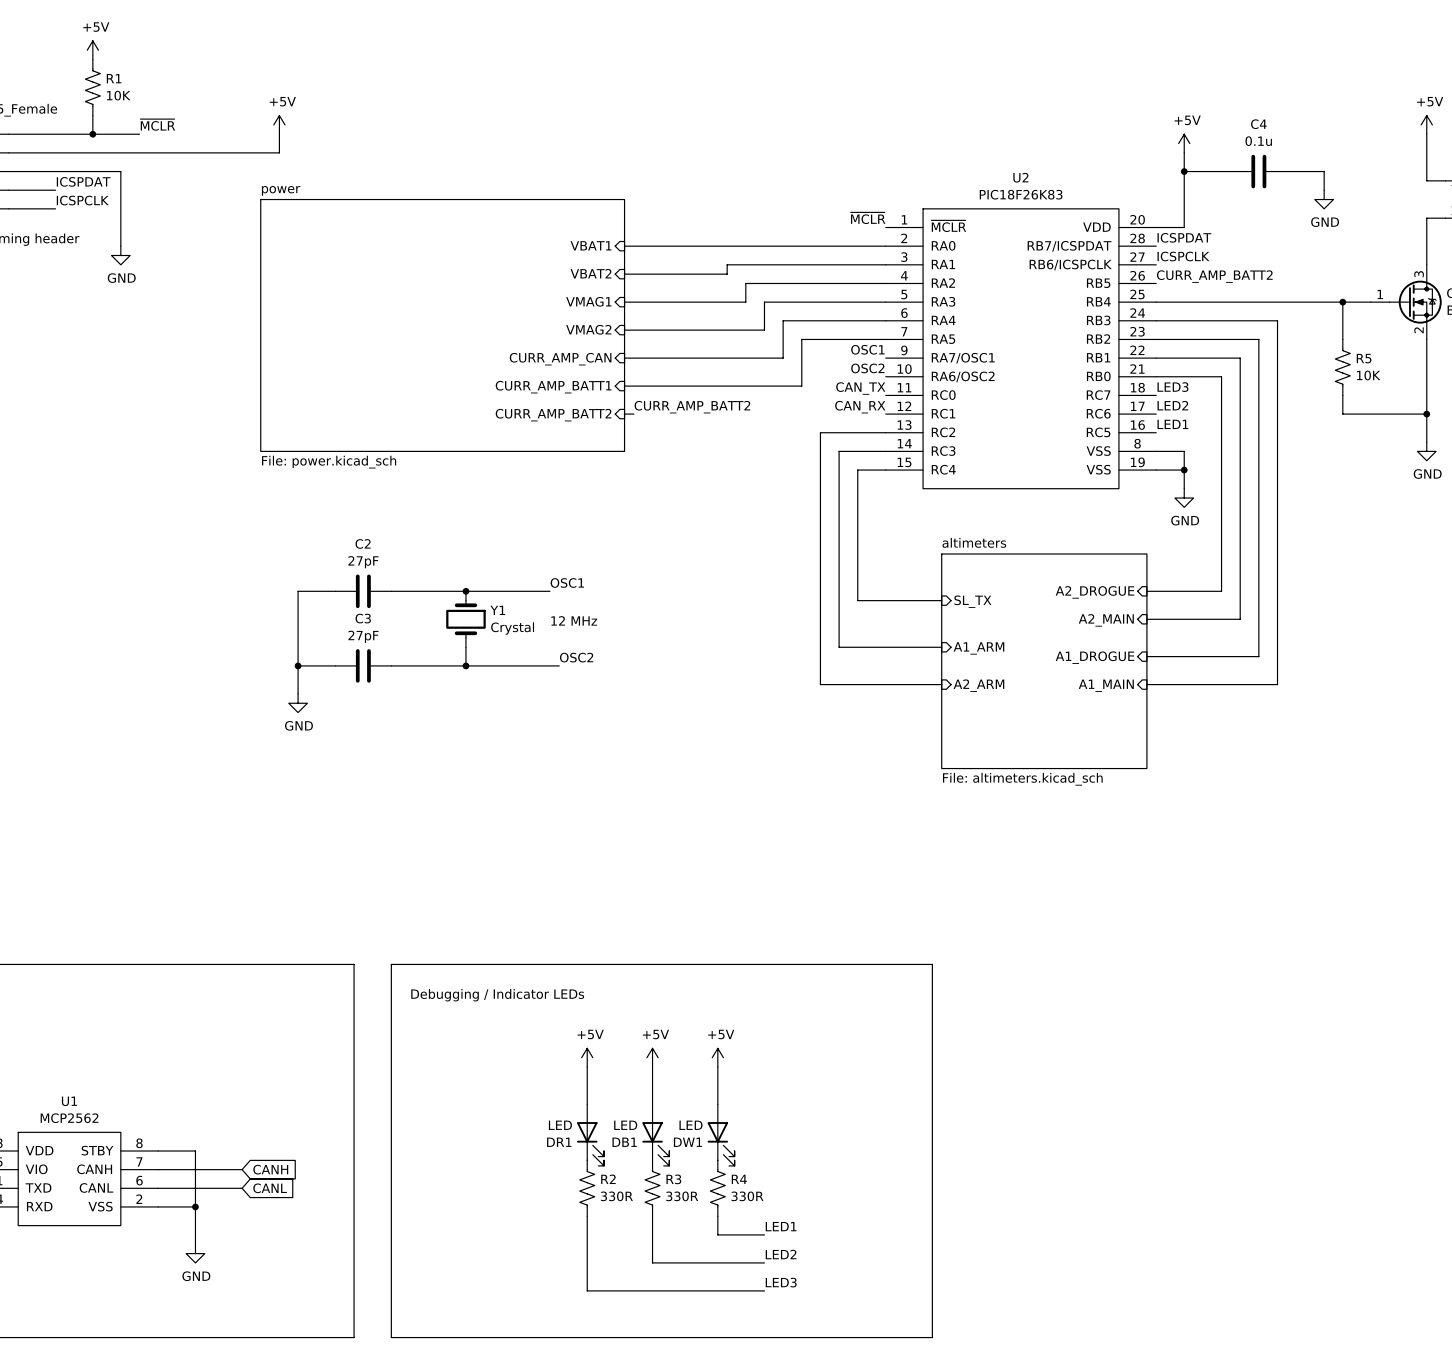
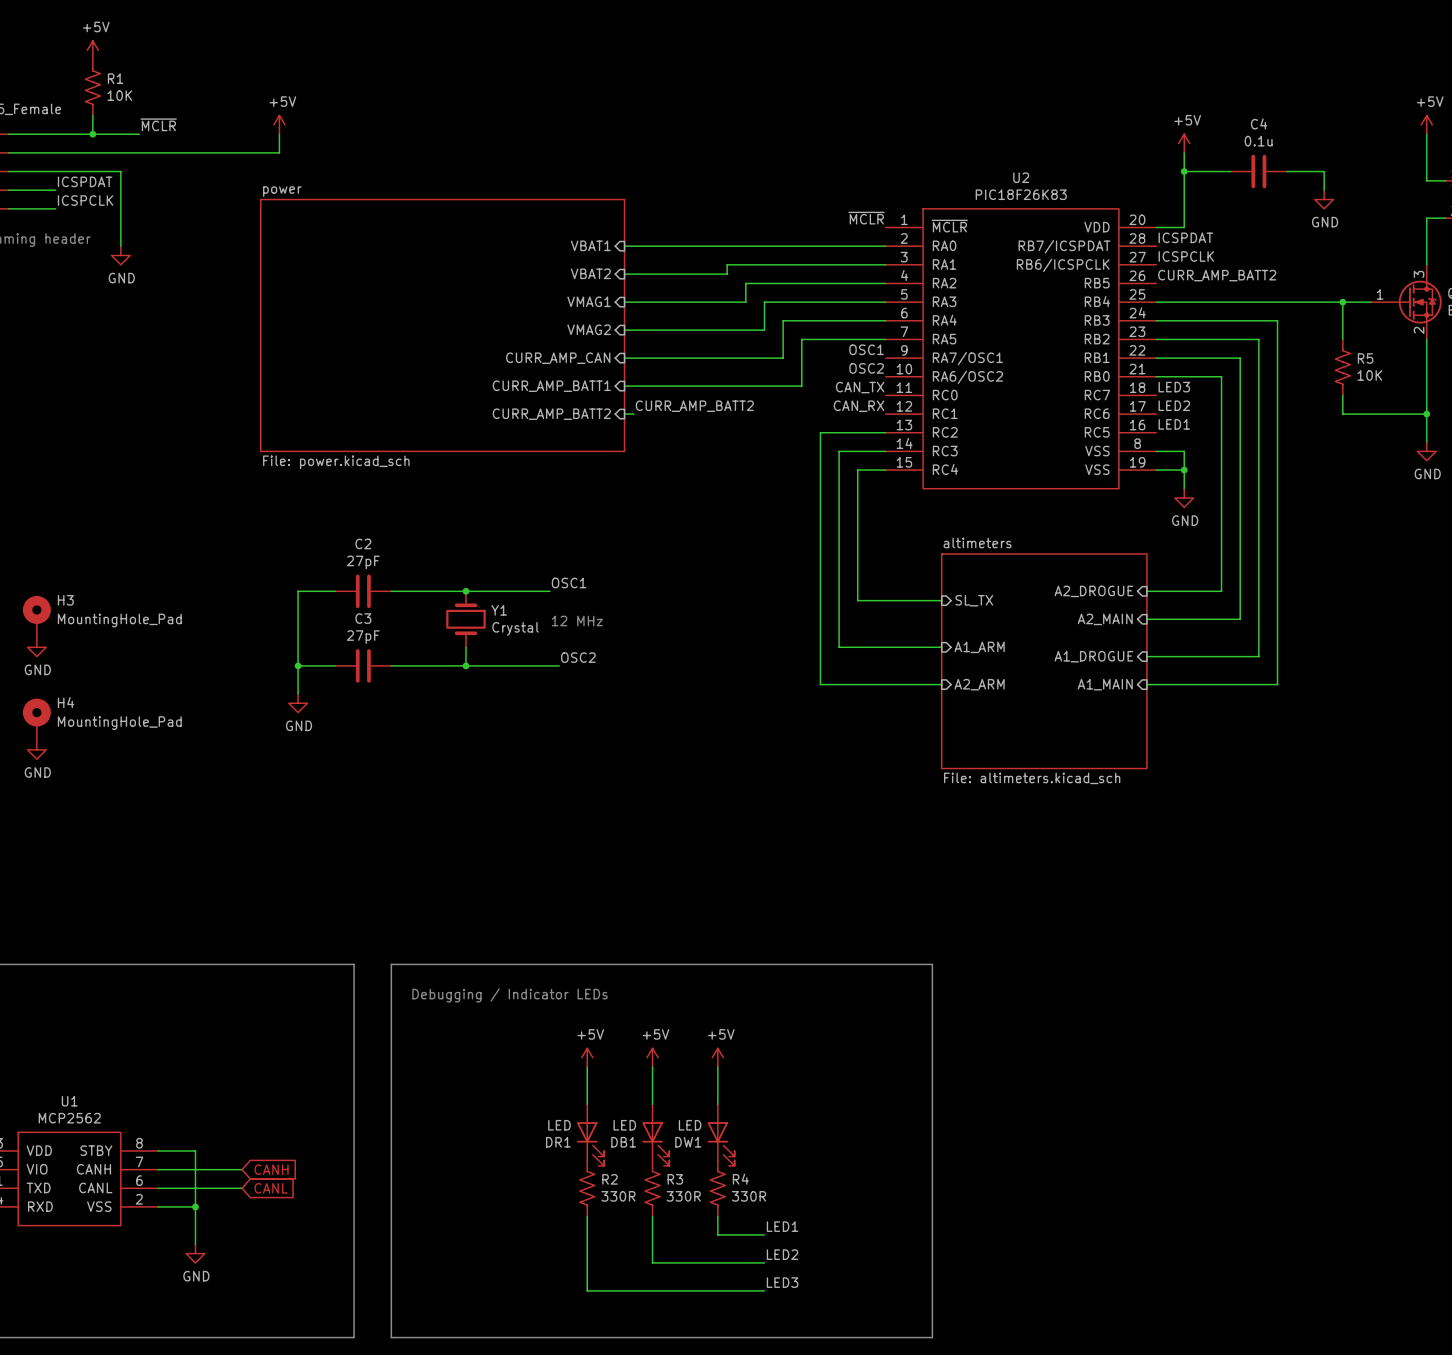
H3: none -> MountingHole_Pad (36, 616)
power symbol: none -> GND (36, 647)
H4: none -> MountingHole_Pad (36, 719)
power symbol: none -> GND (36, 749)

